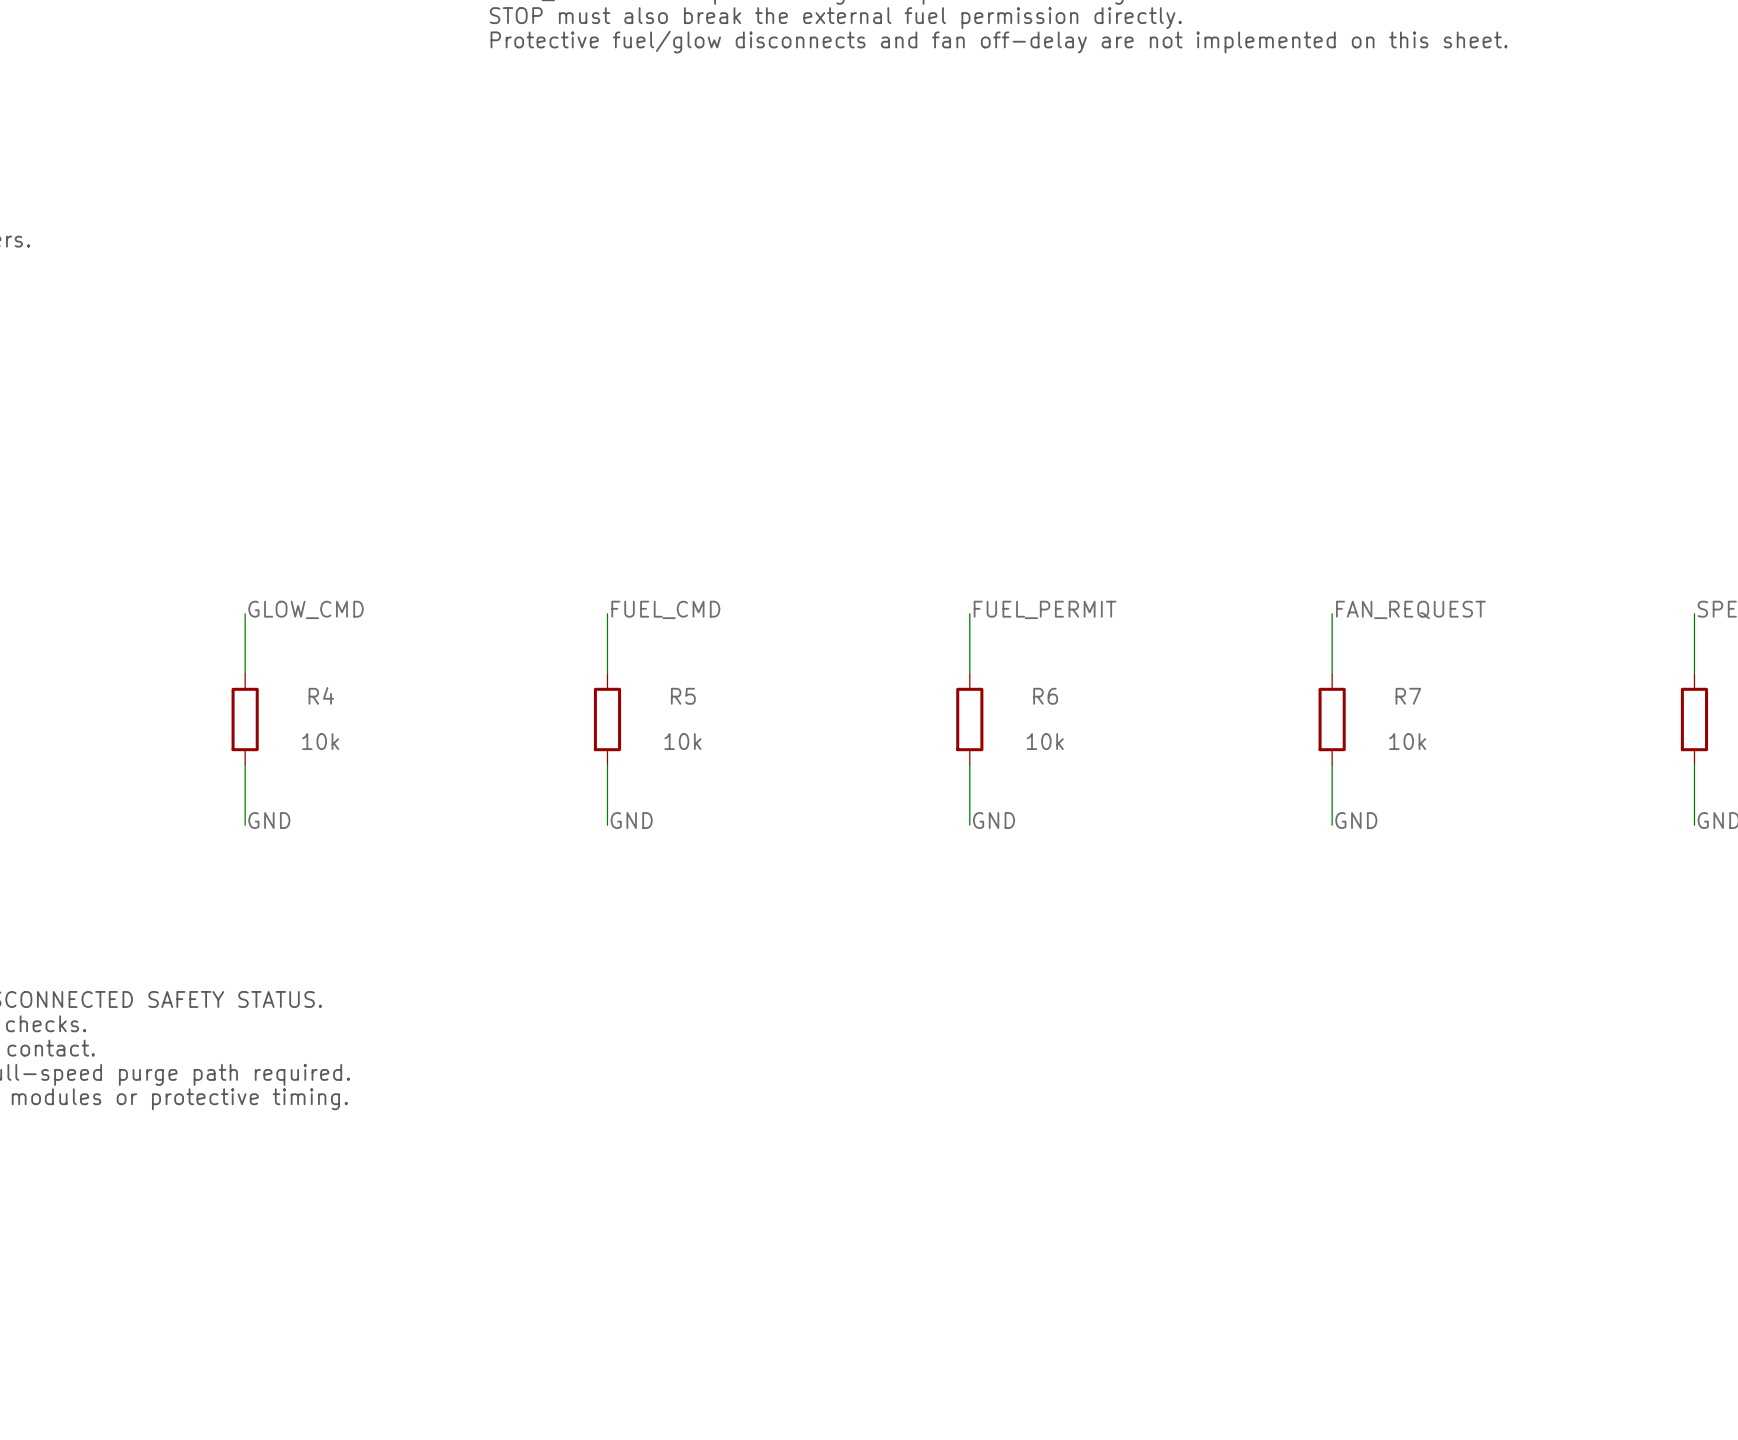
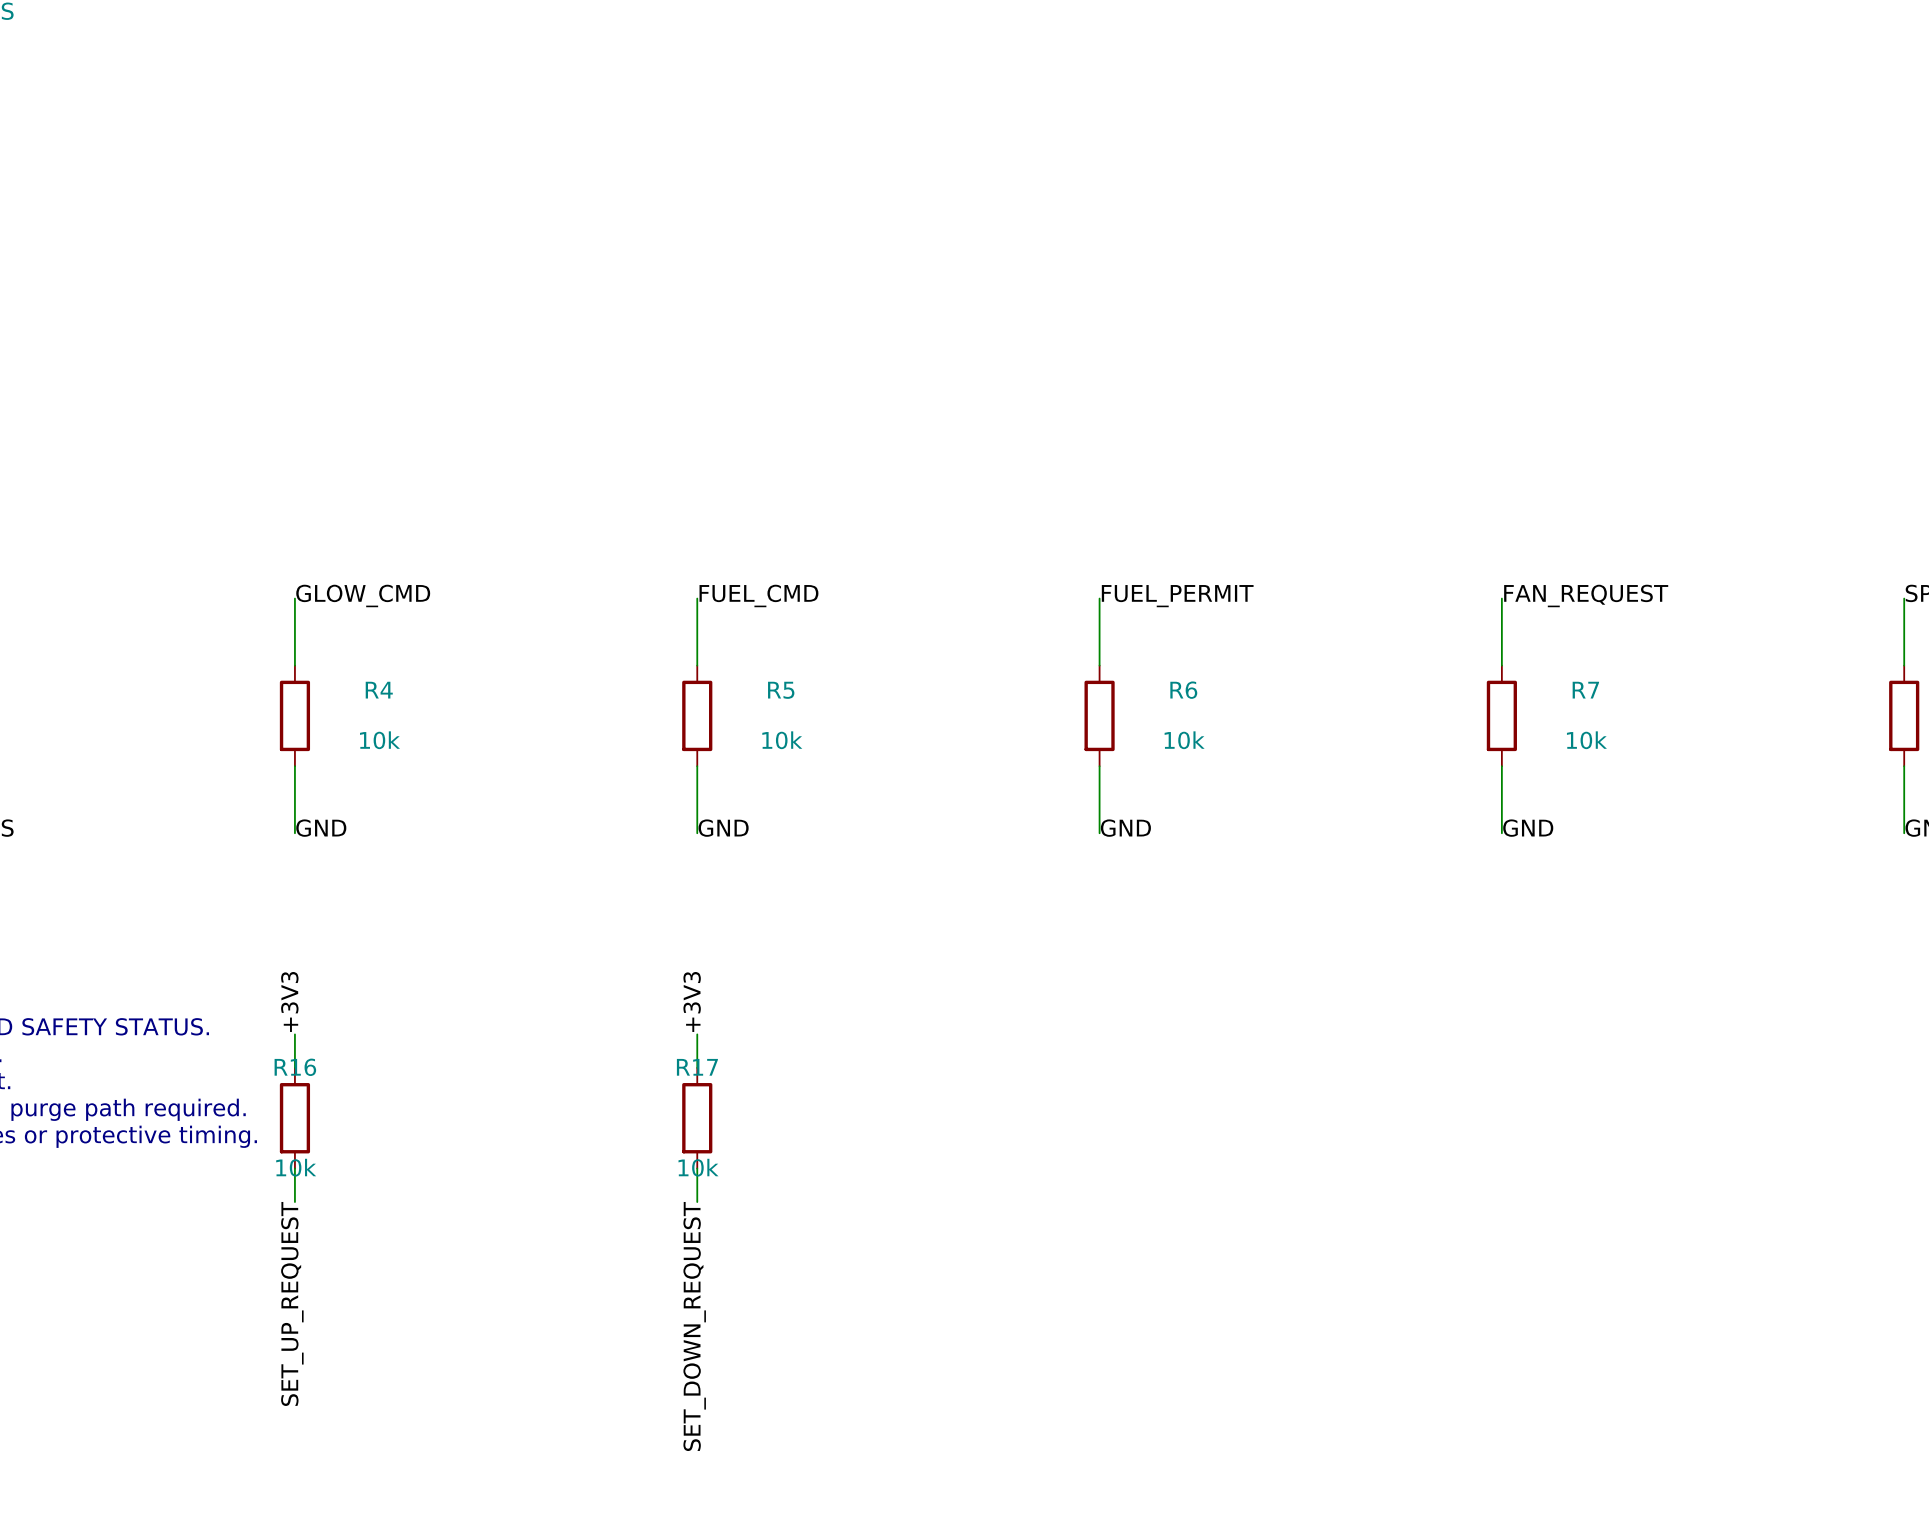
label: none -> +3V3 (289, 1001)
label: none -> +3V3 (692, 1001)
wire: none -> (294, 1034) (294, 1067)
wire: none -> (697, 1034) (697, 1067)
R16: none -> 10k (294, 1118)
R17: none -> 10k (697, 1118)
wire: none -> (294, 1168) (294, 1202)
wire: none -> (697, 1168) (697, 1202)
label: none -> SET_UP_REQUEST (292, 1303)
label: none -> SET_DOWN_REQUEST (694, 1326)

